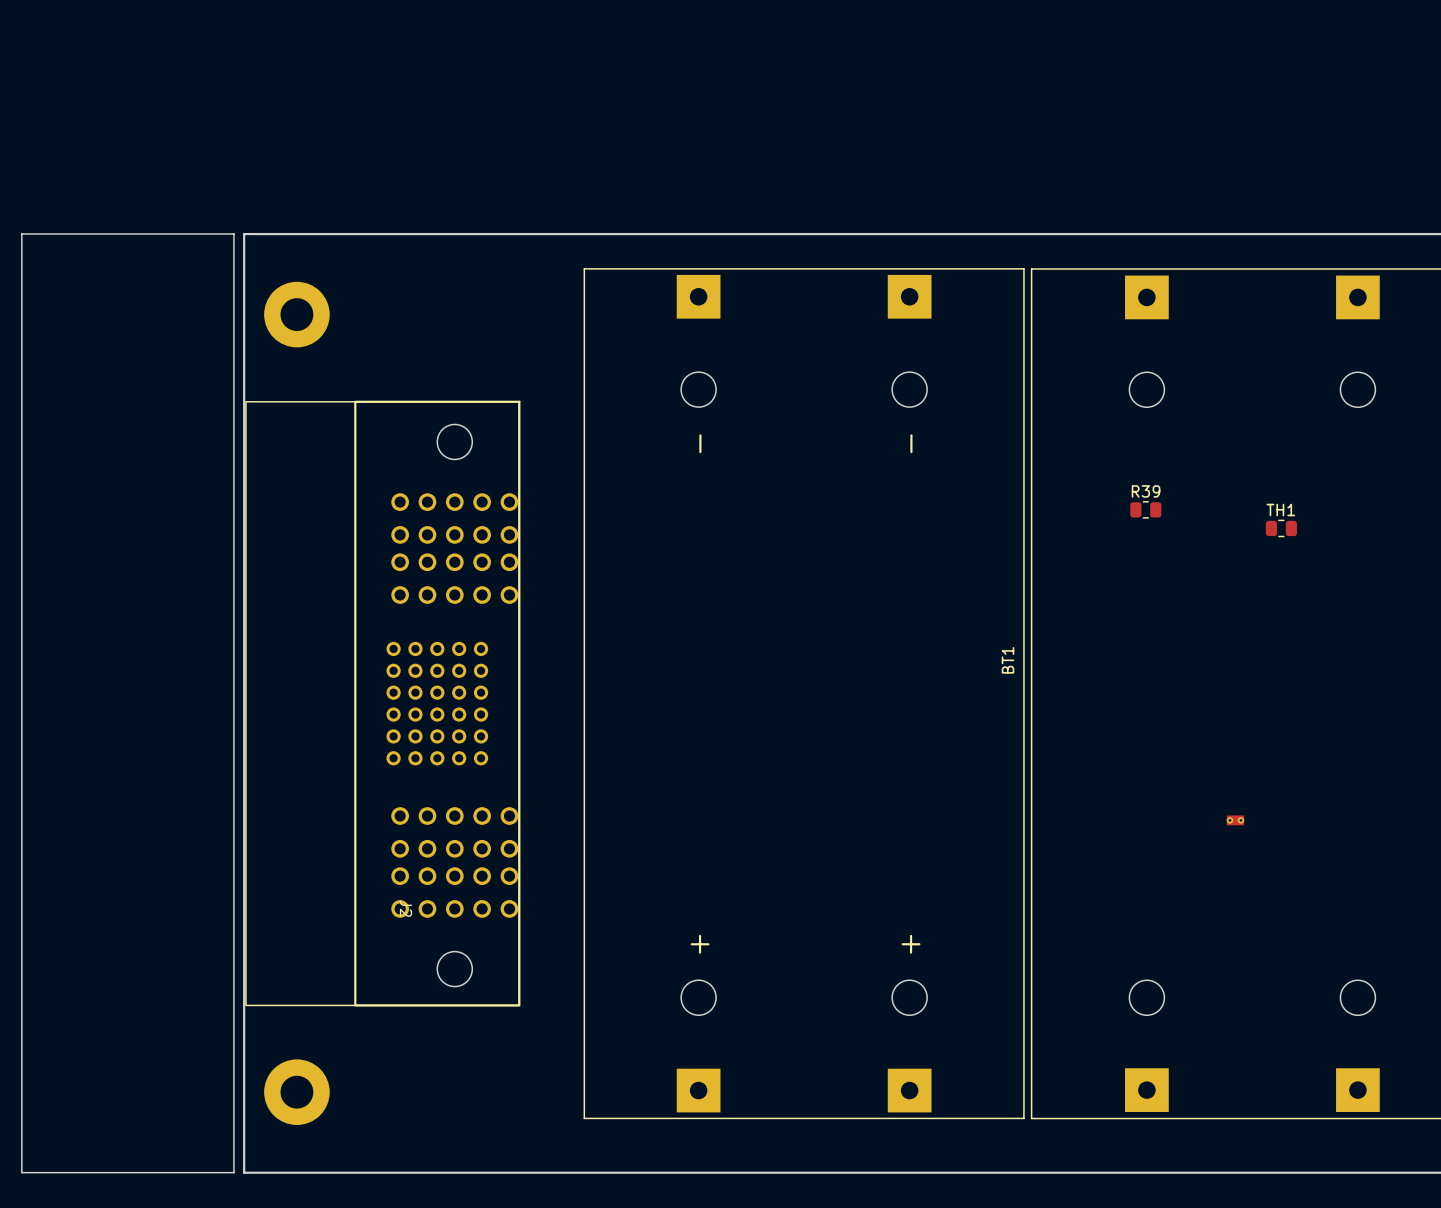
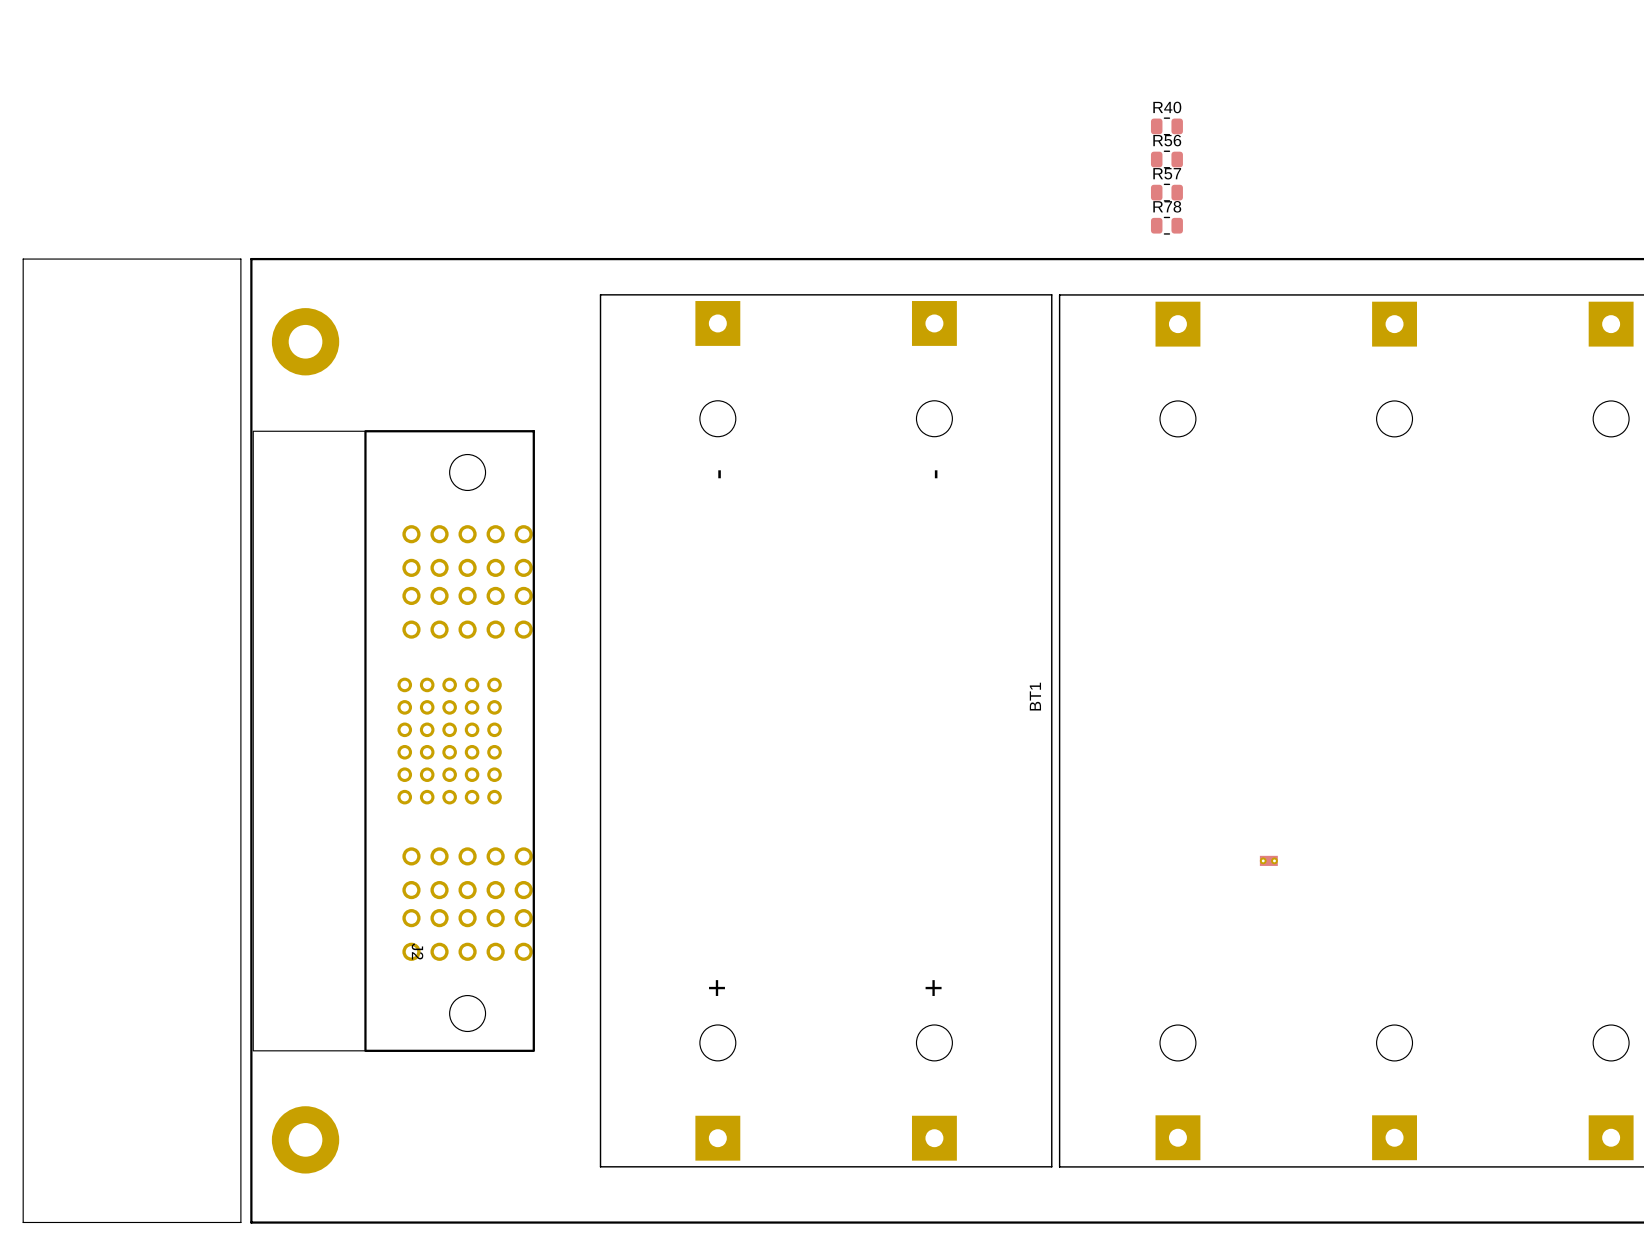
R40: none -> (1166, 126)
R56: none -> (1166, 159)
R57: none -> (1166, 192)
R78: none -> (1166, 225)
R39: (1145, 509) -> none
TH1: (1281, 528) -> none

